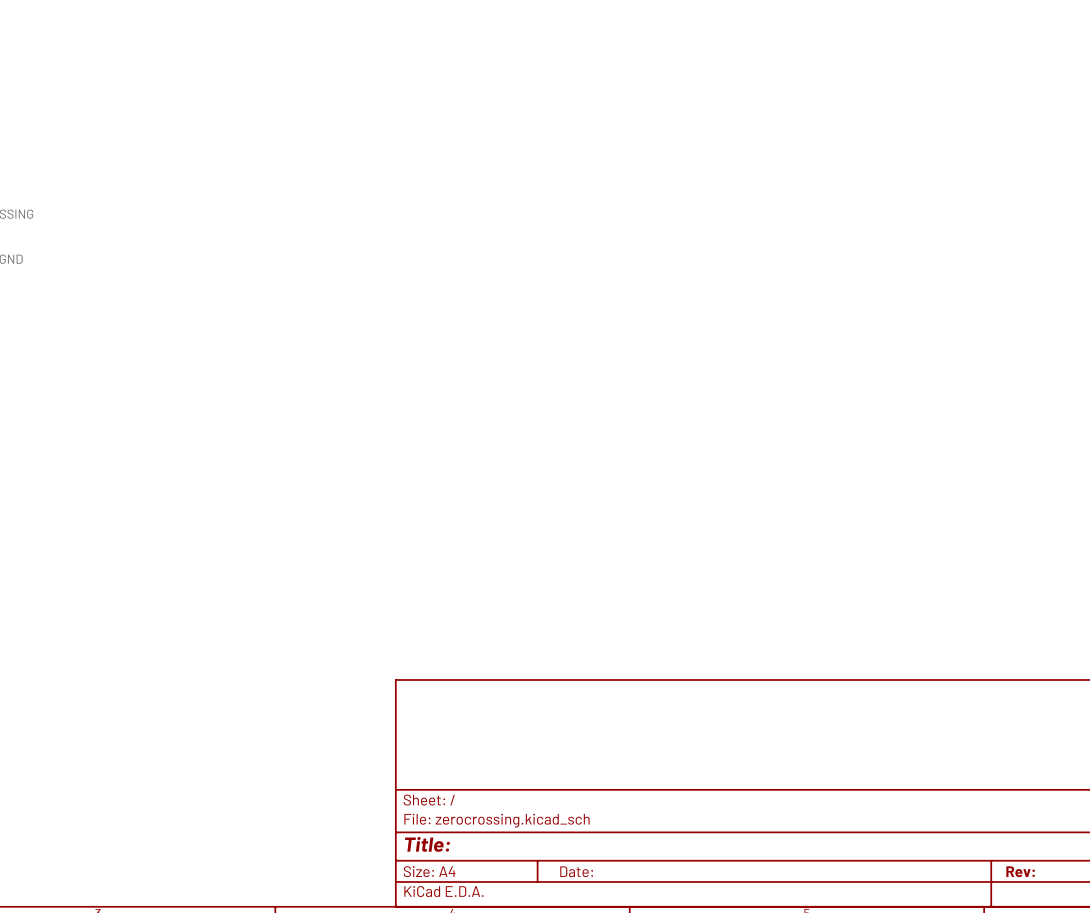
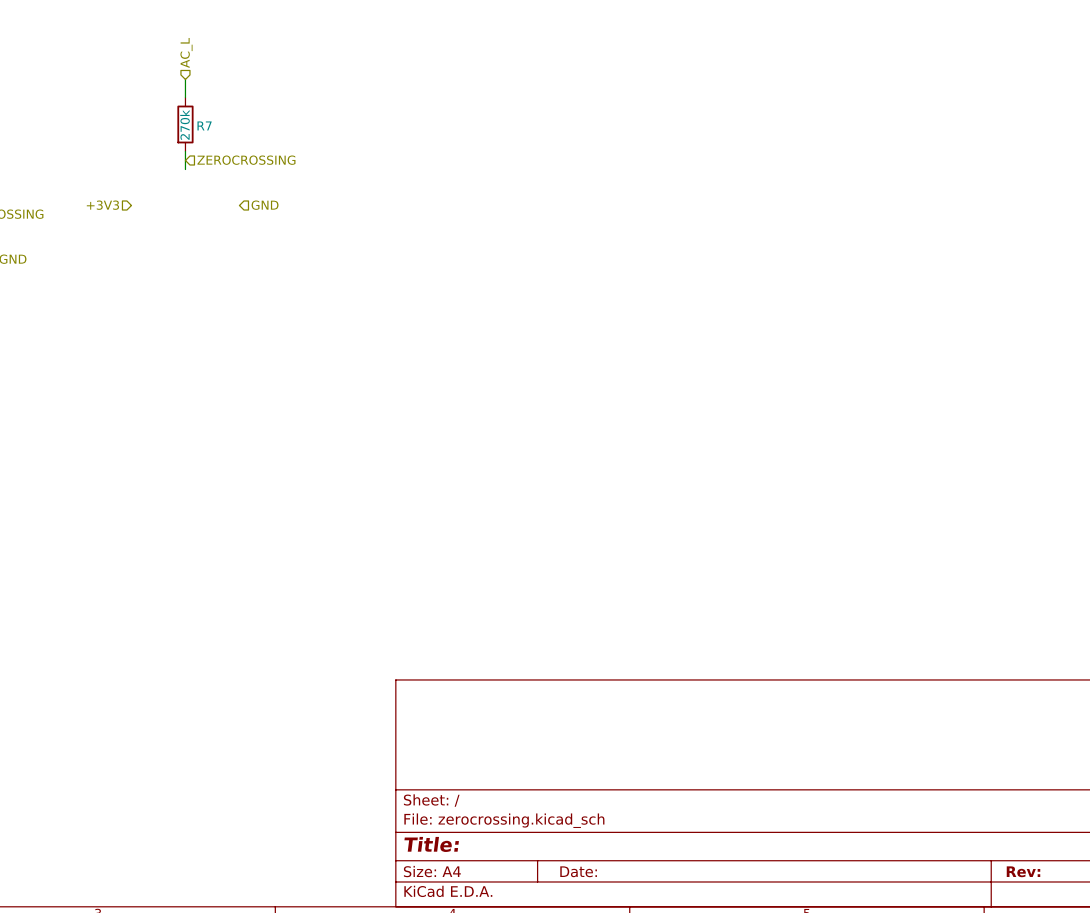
hierarchical label: none -> AC_L (186, 52)
wire: none -> (185, 79) (185, 97)
R7: none -> 270k (185, 124)
wire: none -> (185, 151) (185, 169)
hierarchical label: none -> ZEROCROSSING (246, 160)
hierarchical label: none -> +3V3 (102, 205)
hierarchical label: none -> GND (265, 205)

